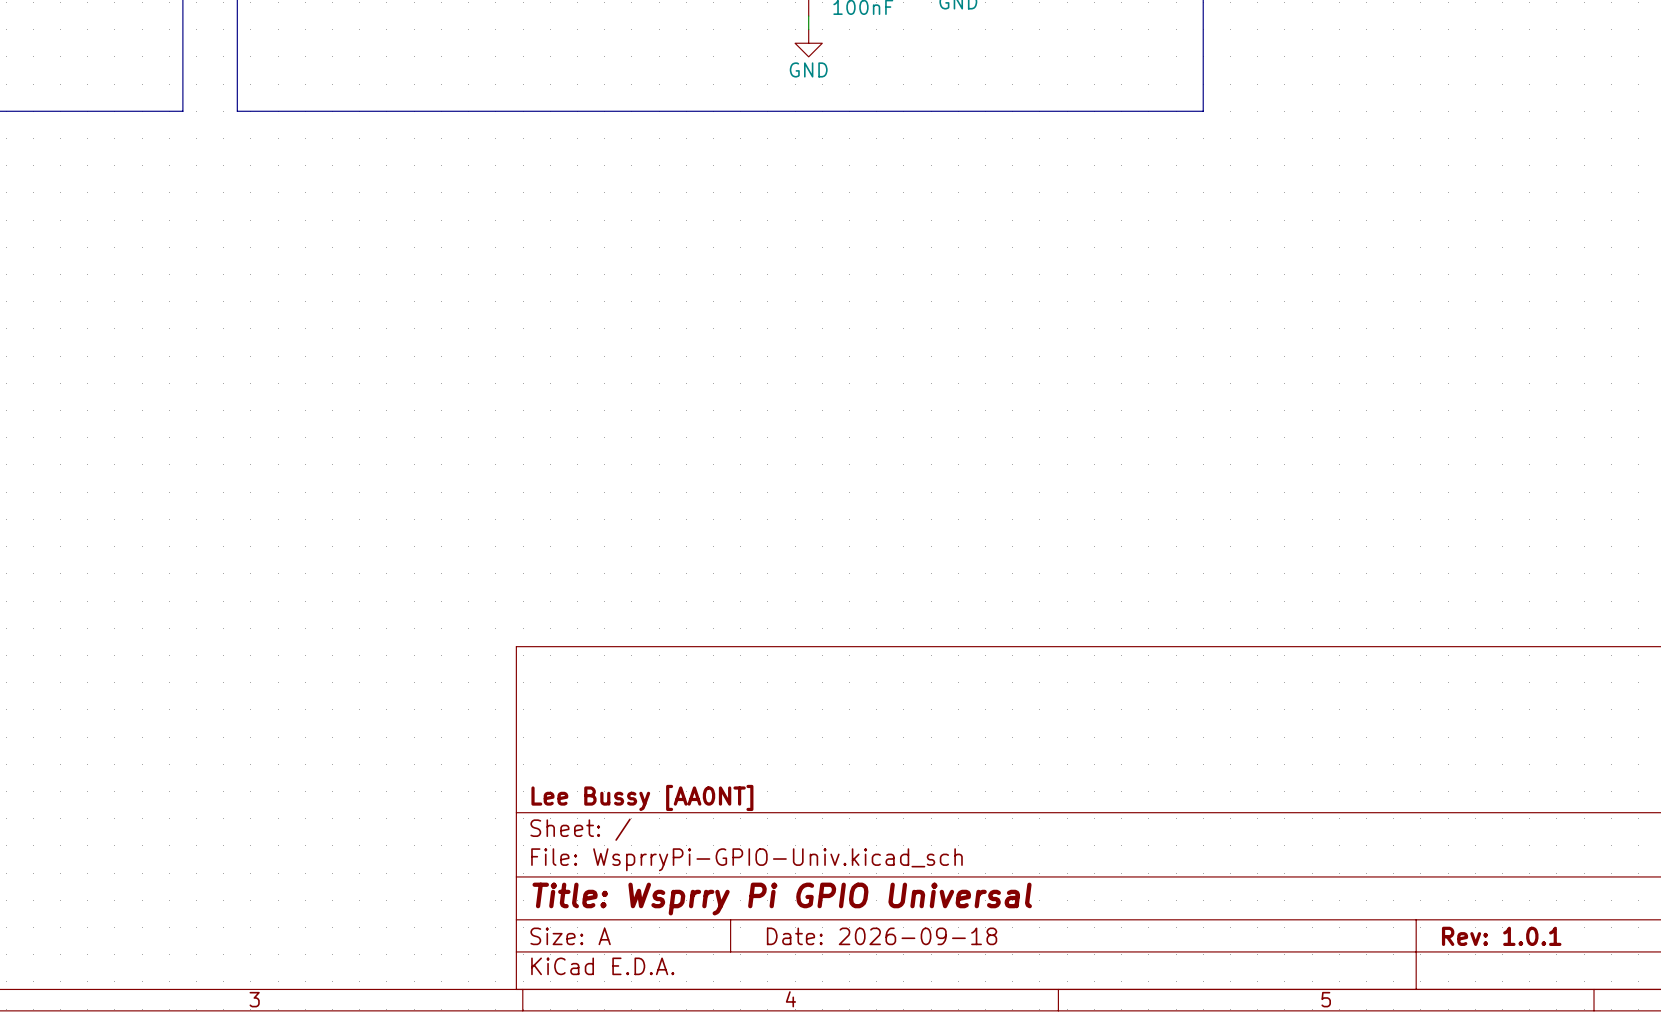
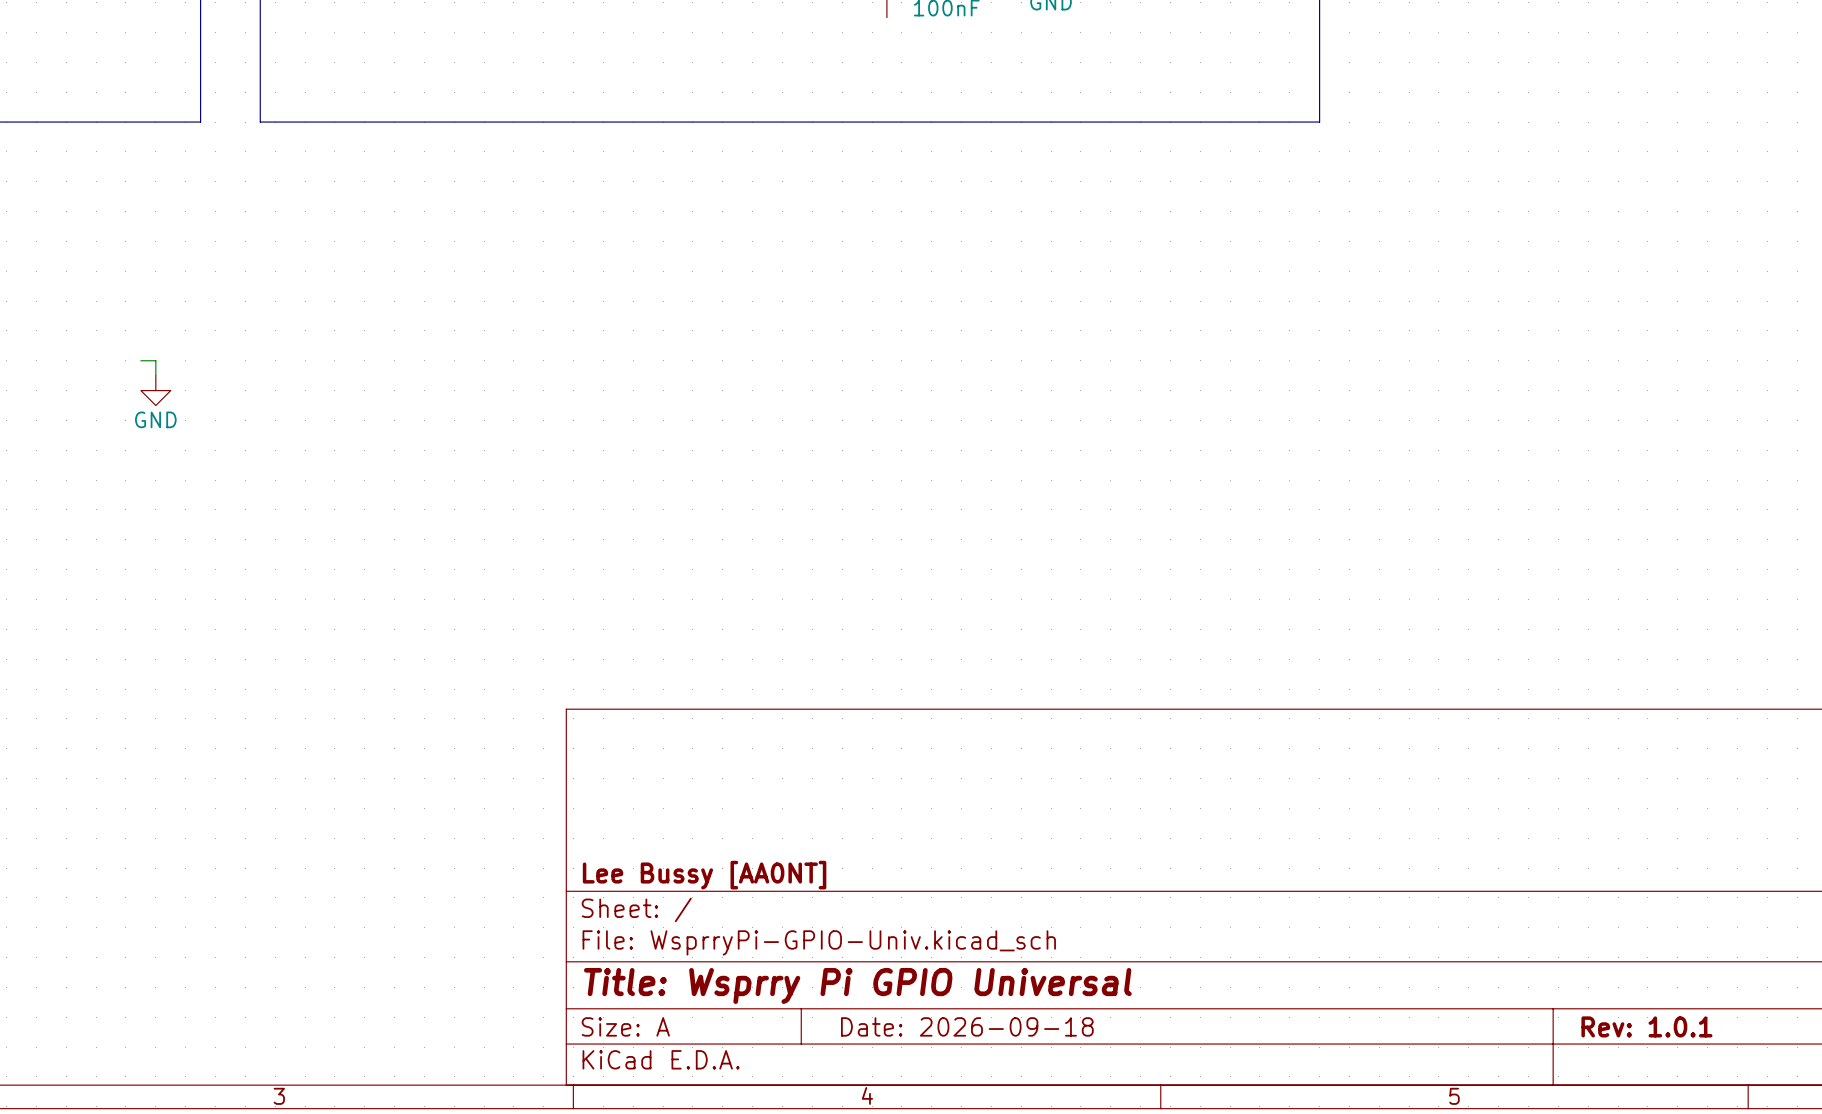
wire: (808, 16) (808, 29) -> none
power symbol: GND (808, 43) -> none
wire: none -> (140, 360) (155, 360) (155, 375)
power symbol: none -> GND (155, 390)

